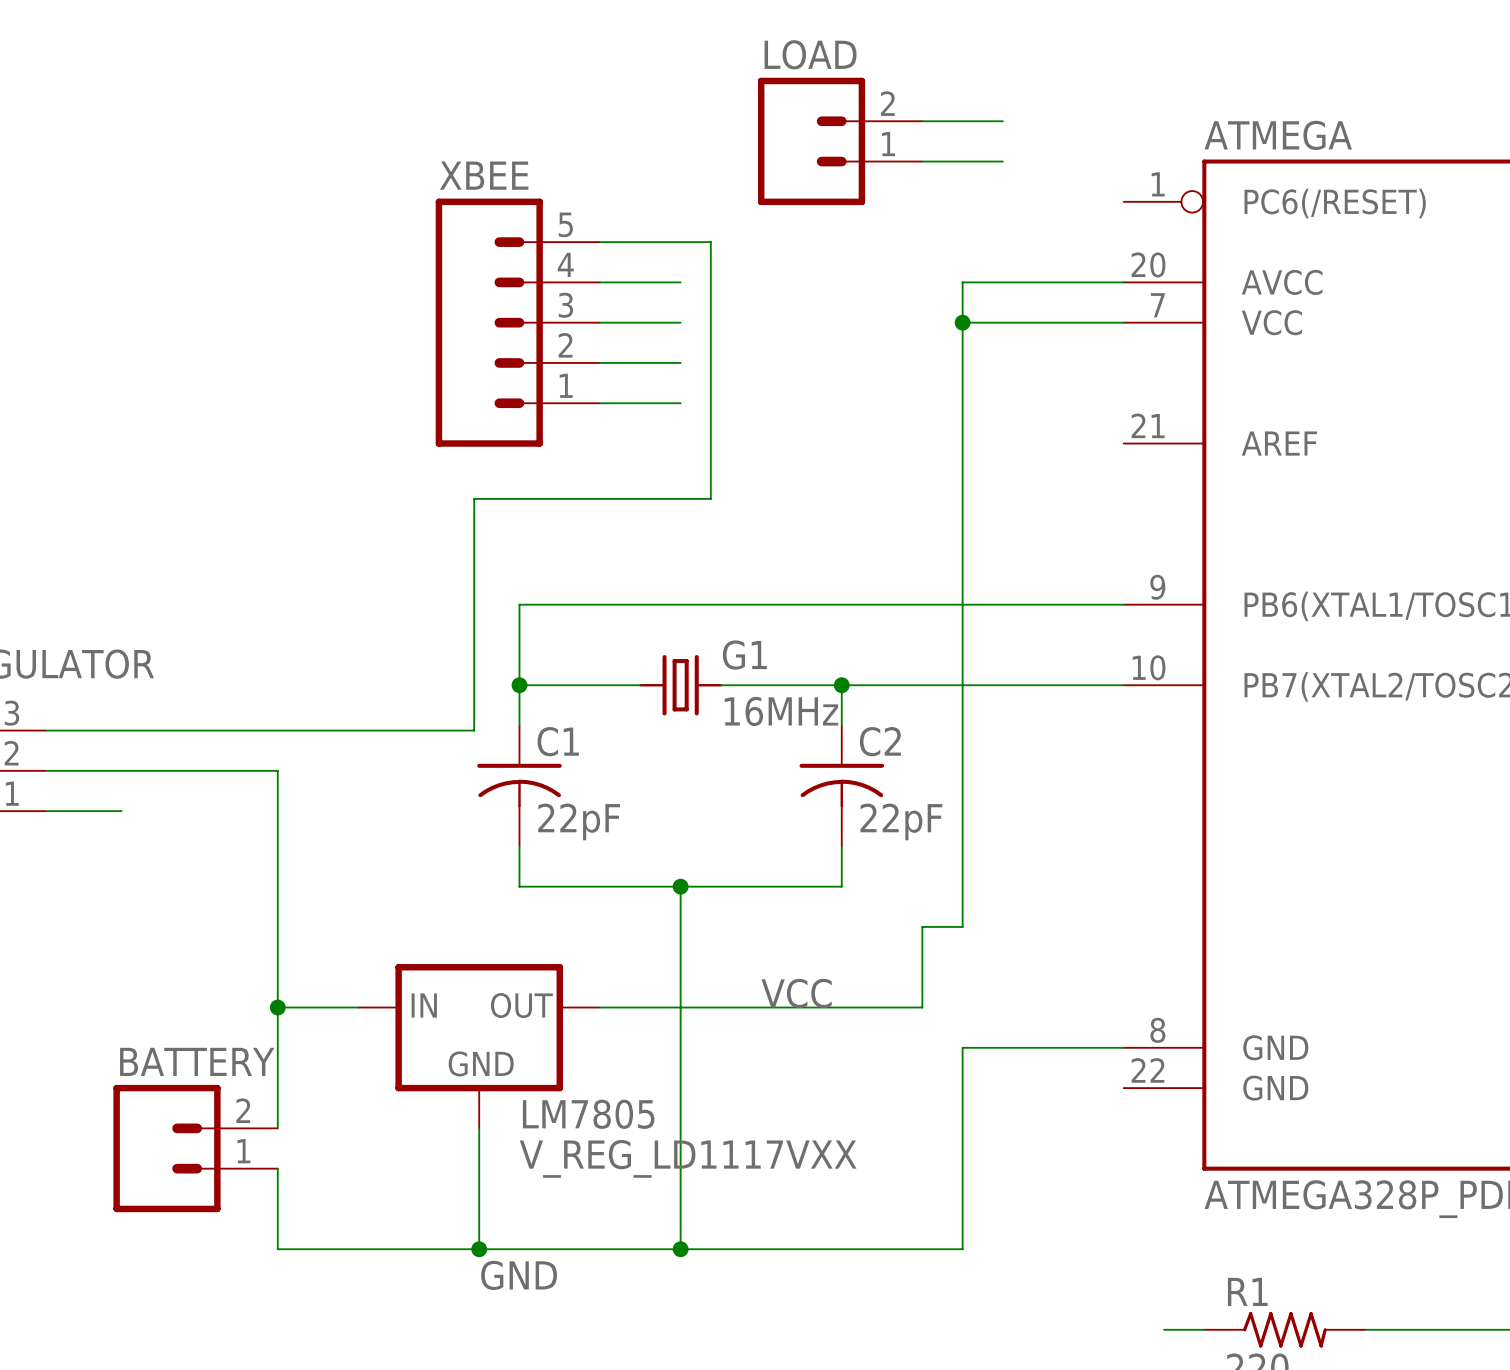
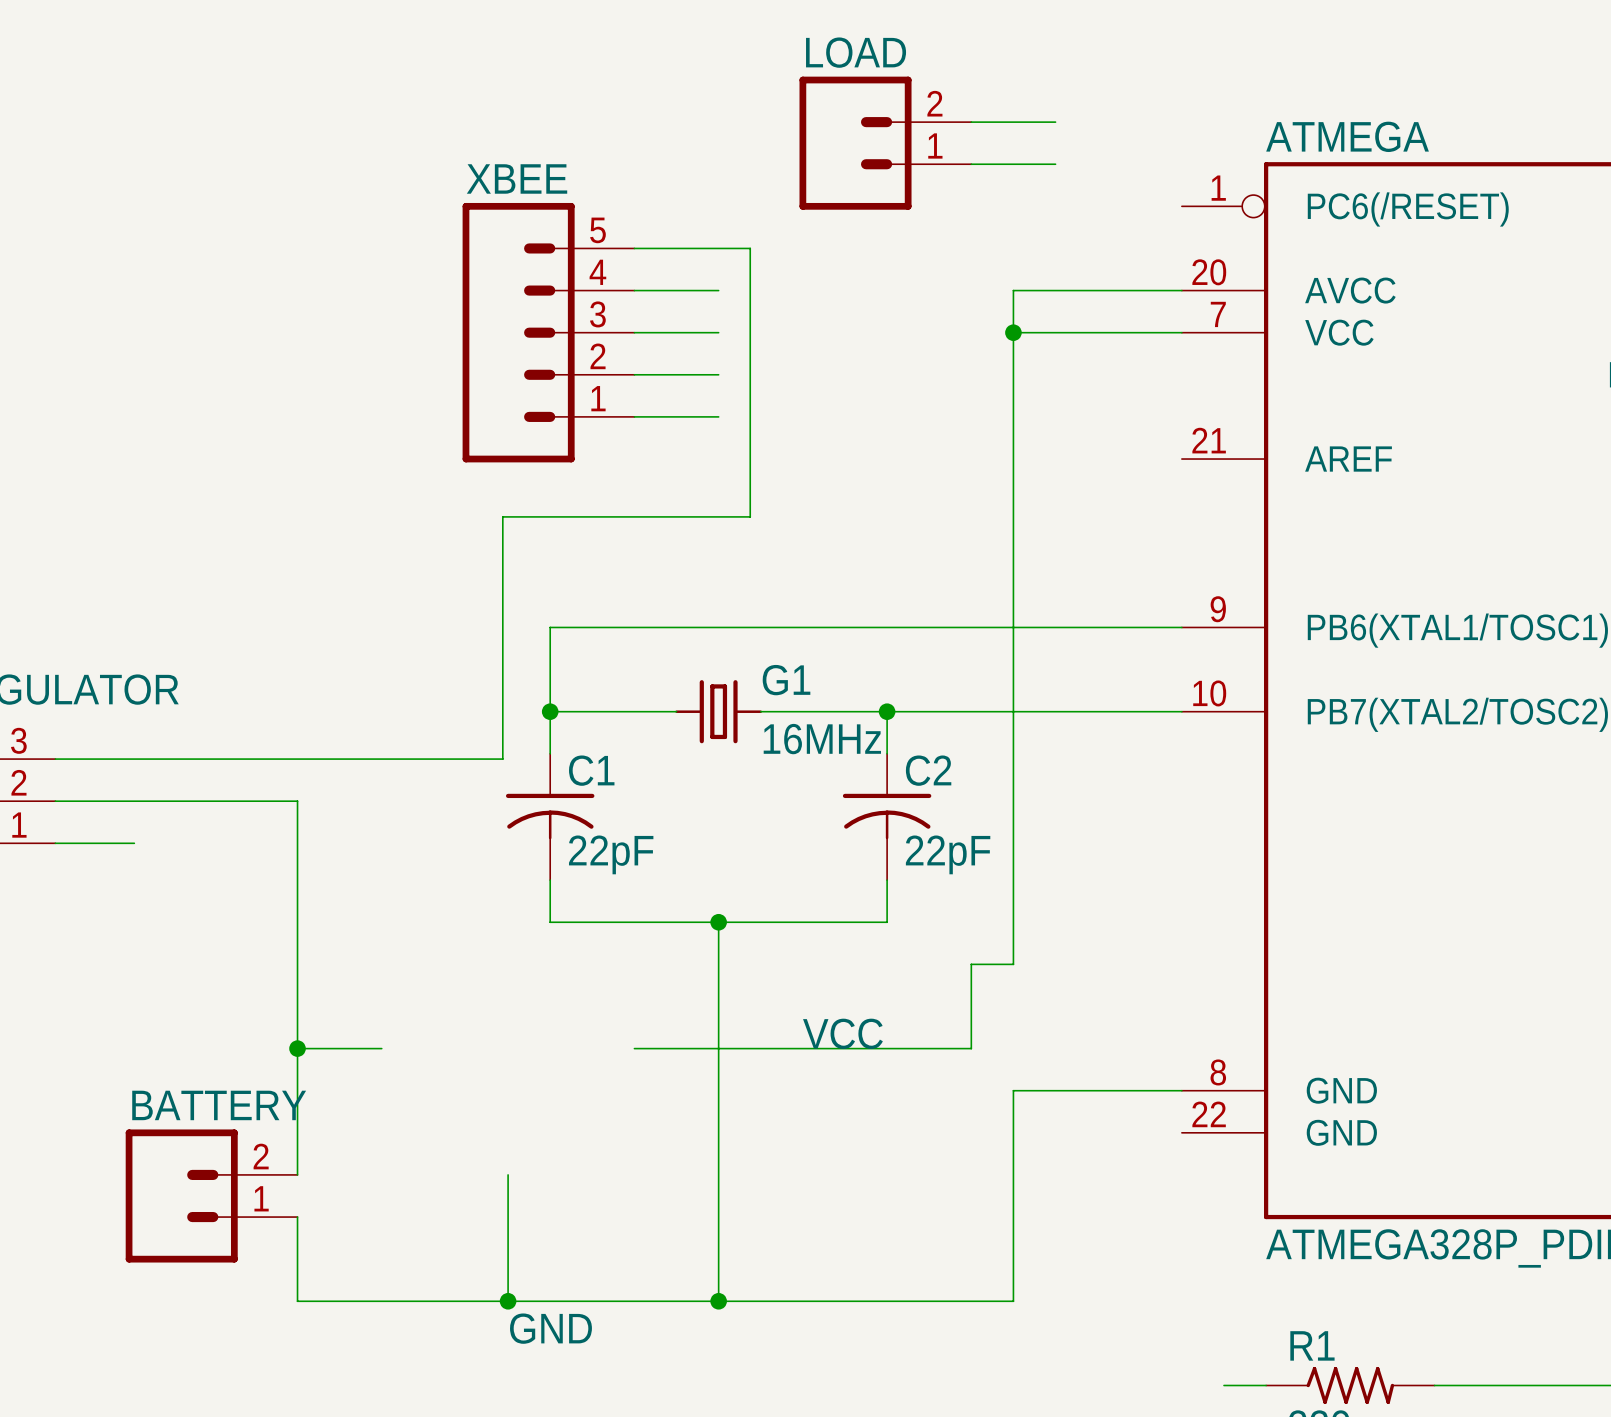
LM7805: V_REG_LD1117VXX (479, 1046) -> none

